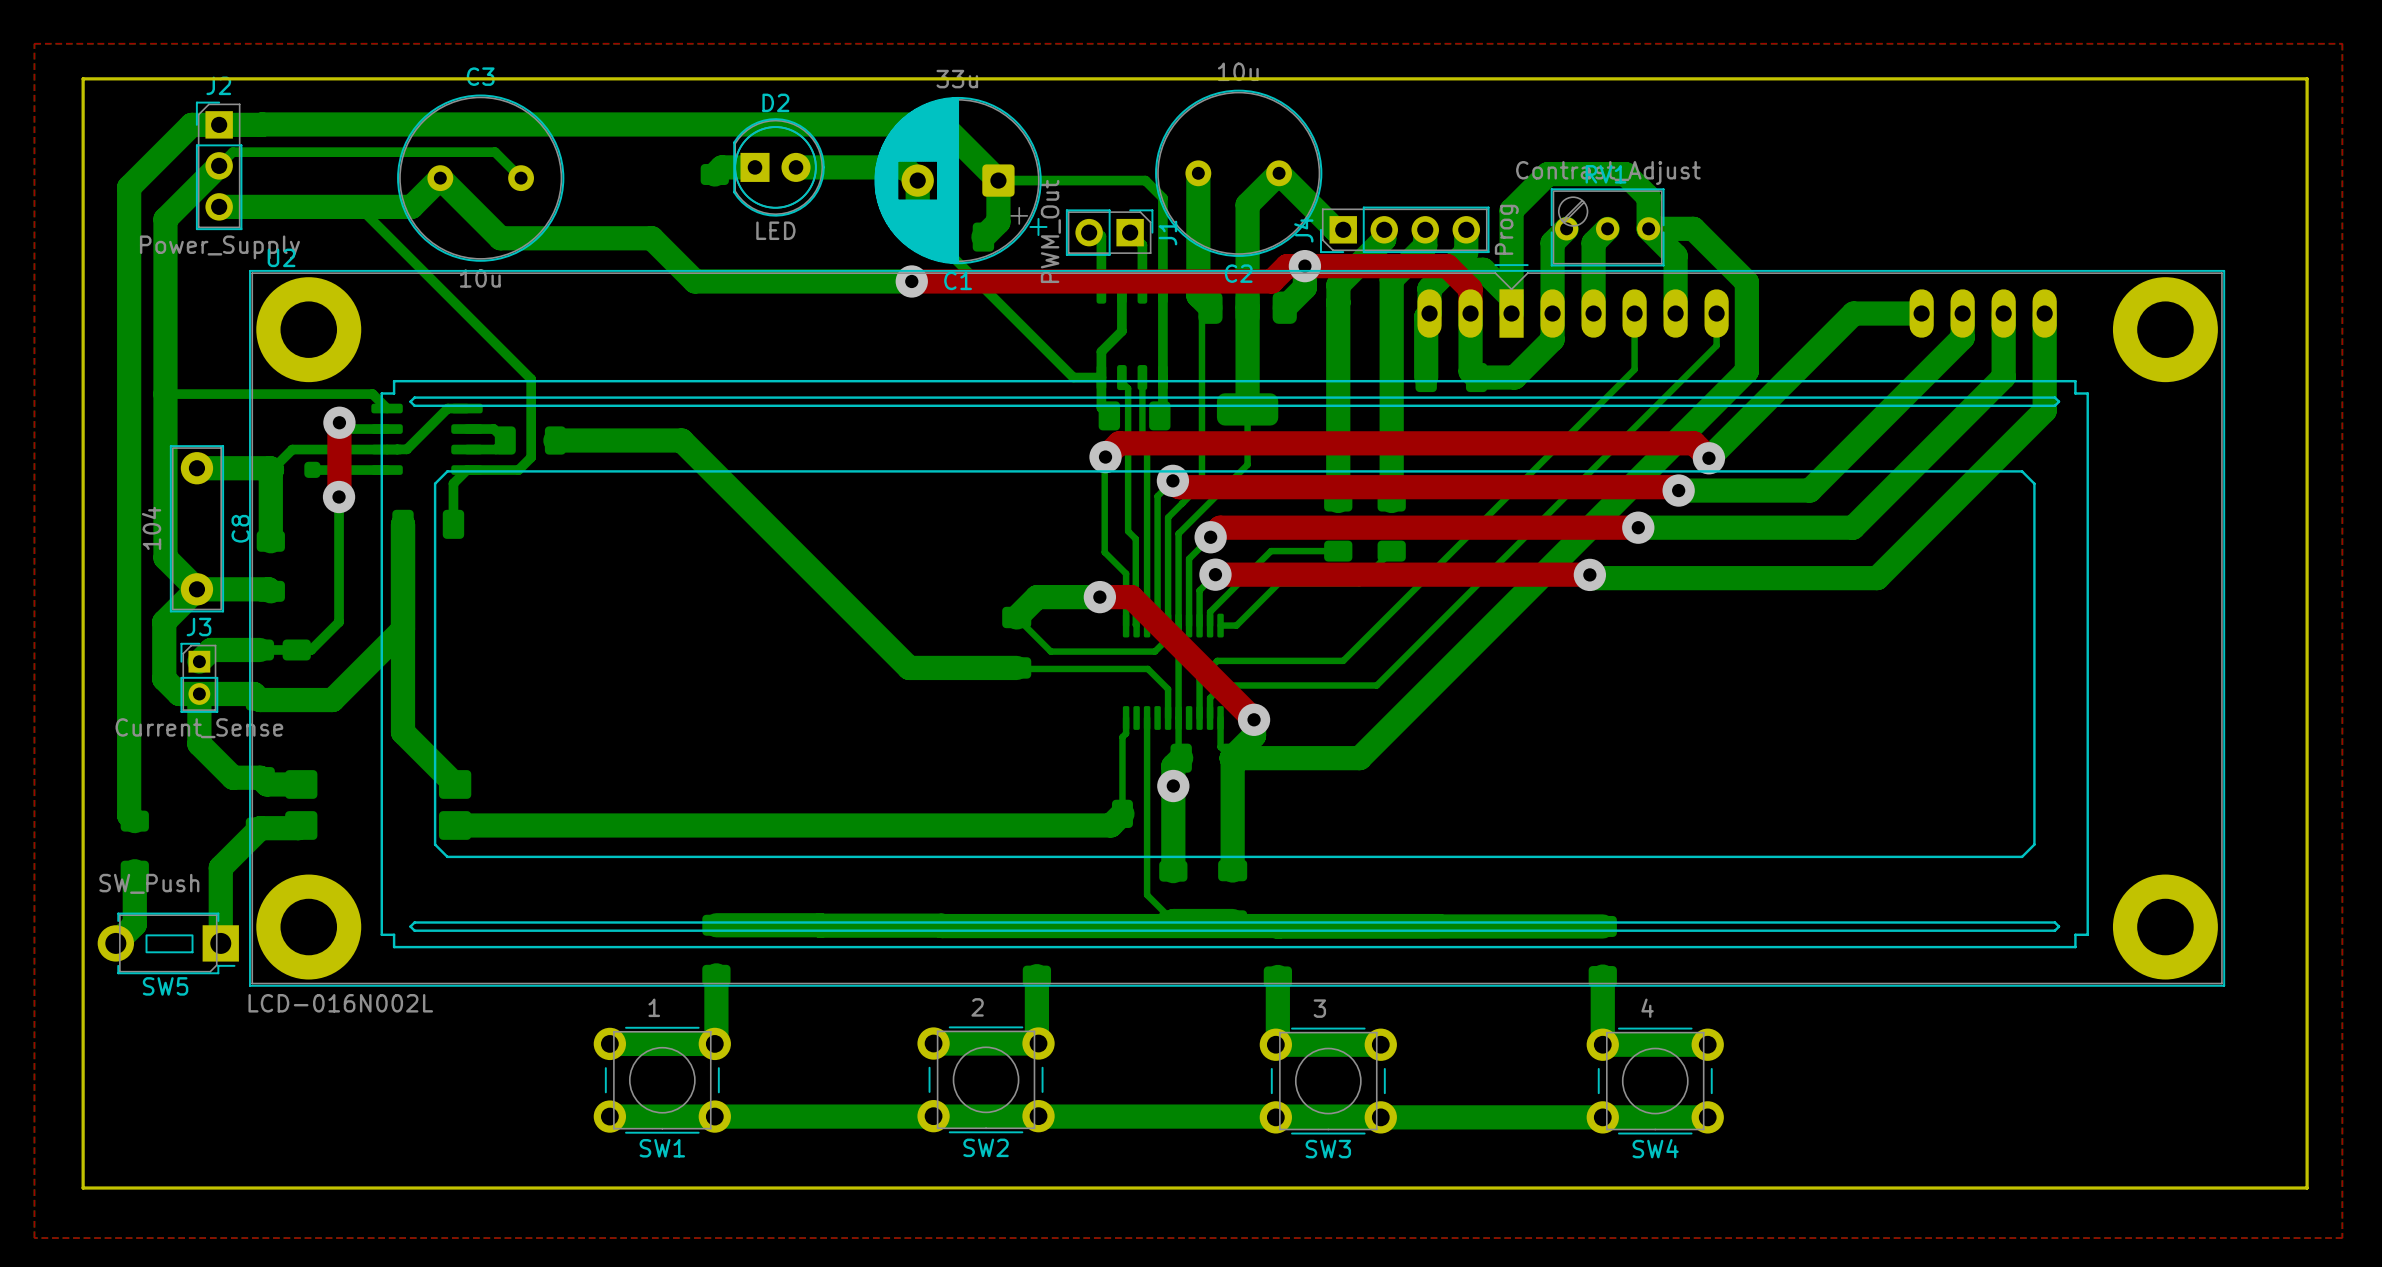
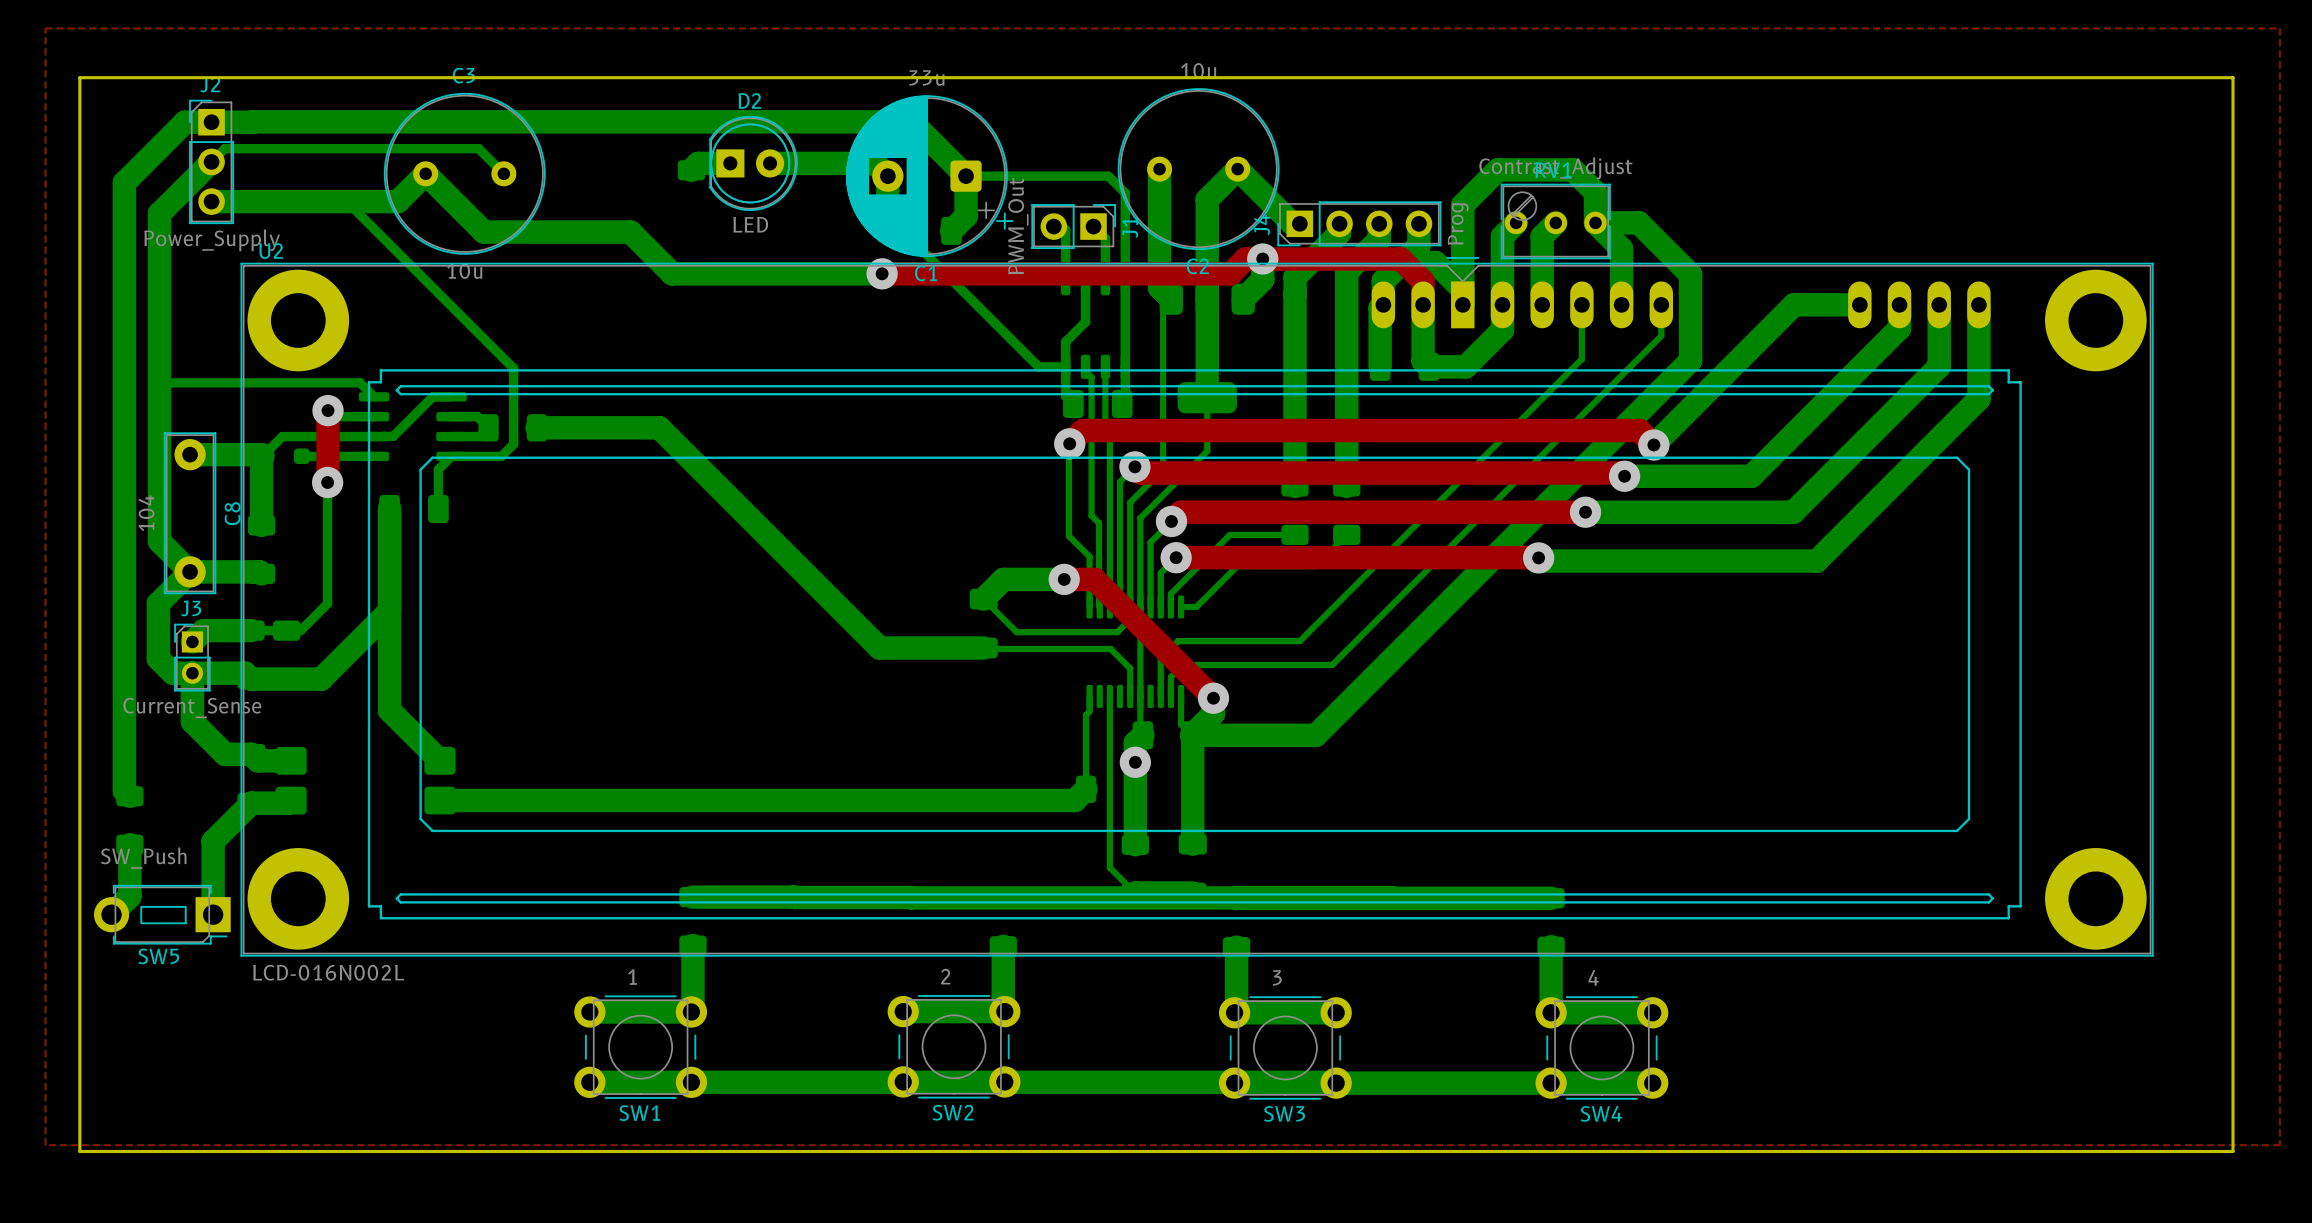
top zone outline: (34, 43) (2342, 43) (2342, 1238) (34, 1238) (34, 43) -> (45, 28) (45, 1145) (2279, 1145) (2279, 28) (45, 28)

